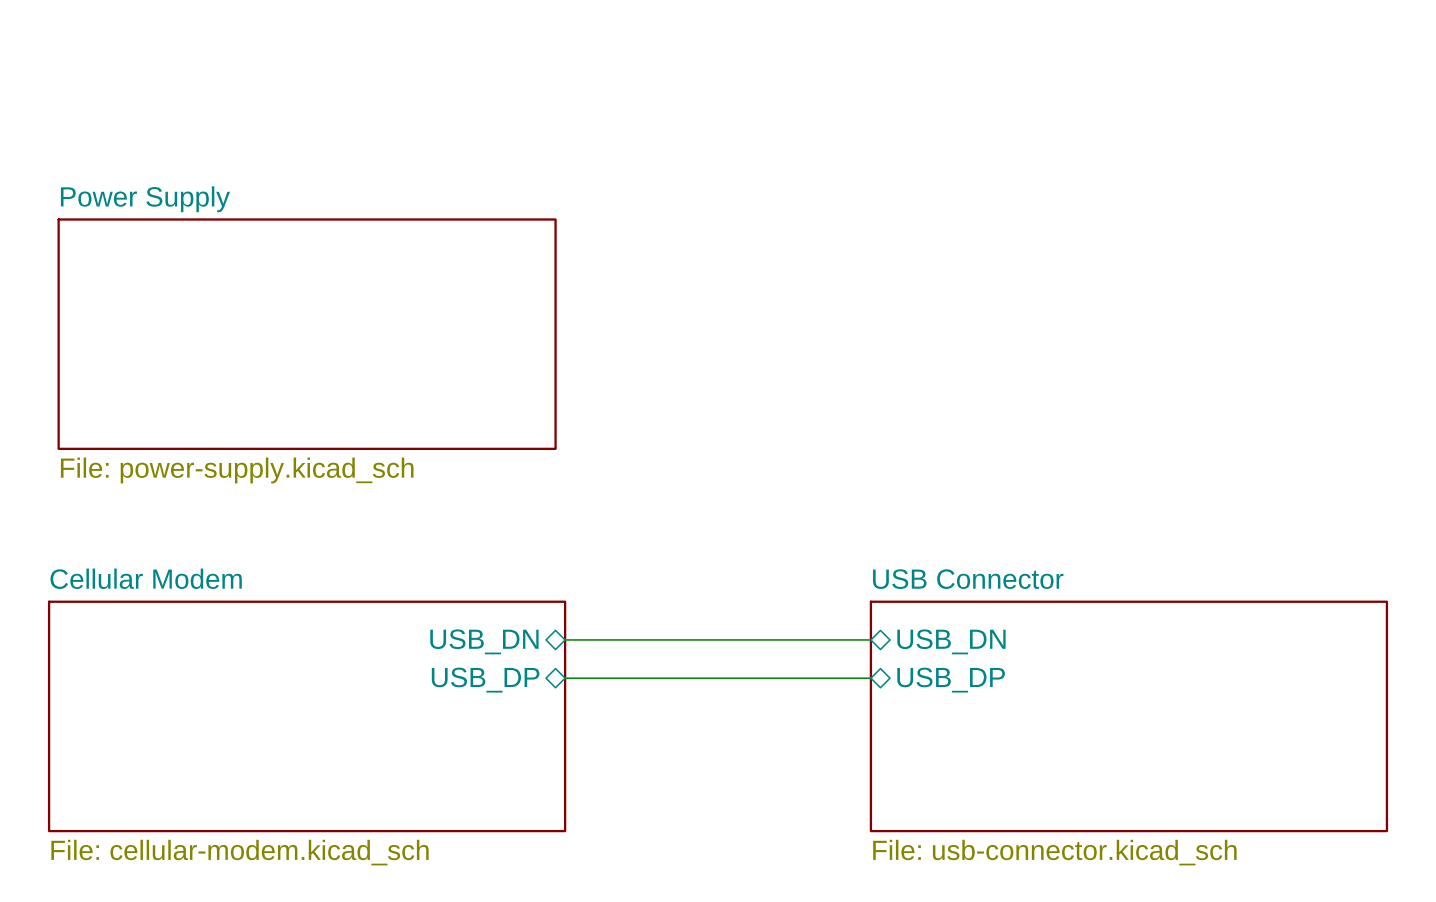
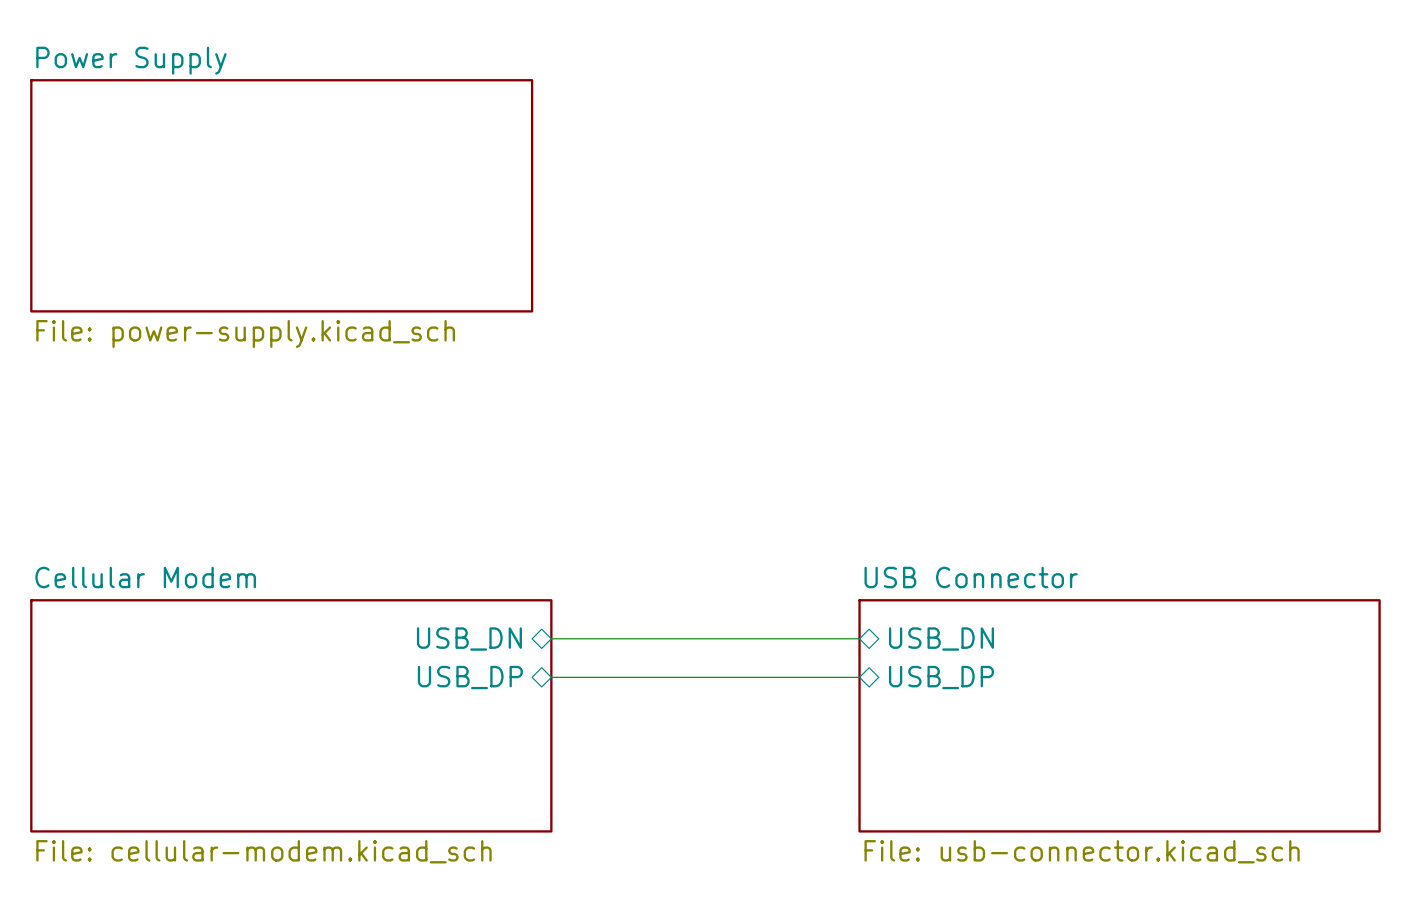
sheet Power Supply position: (307, 334) -> (281, 195)

